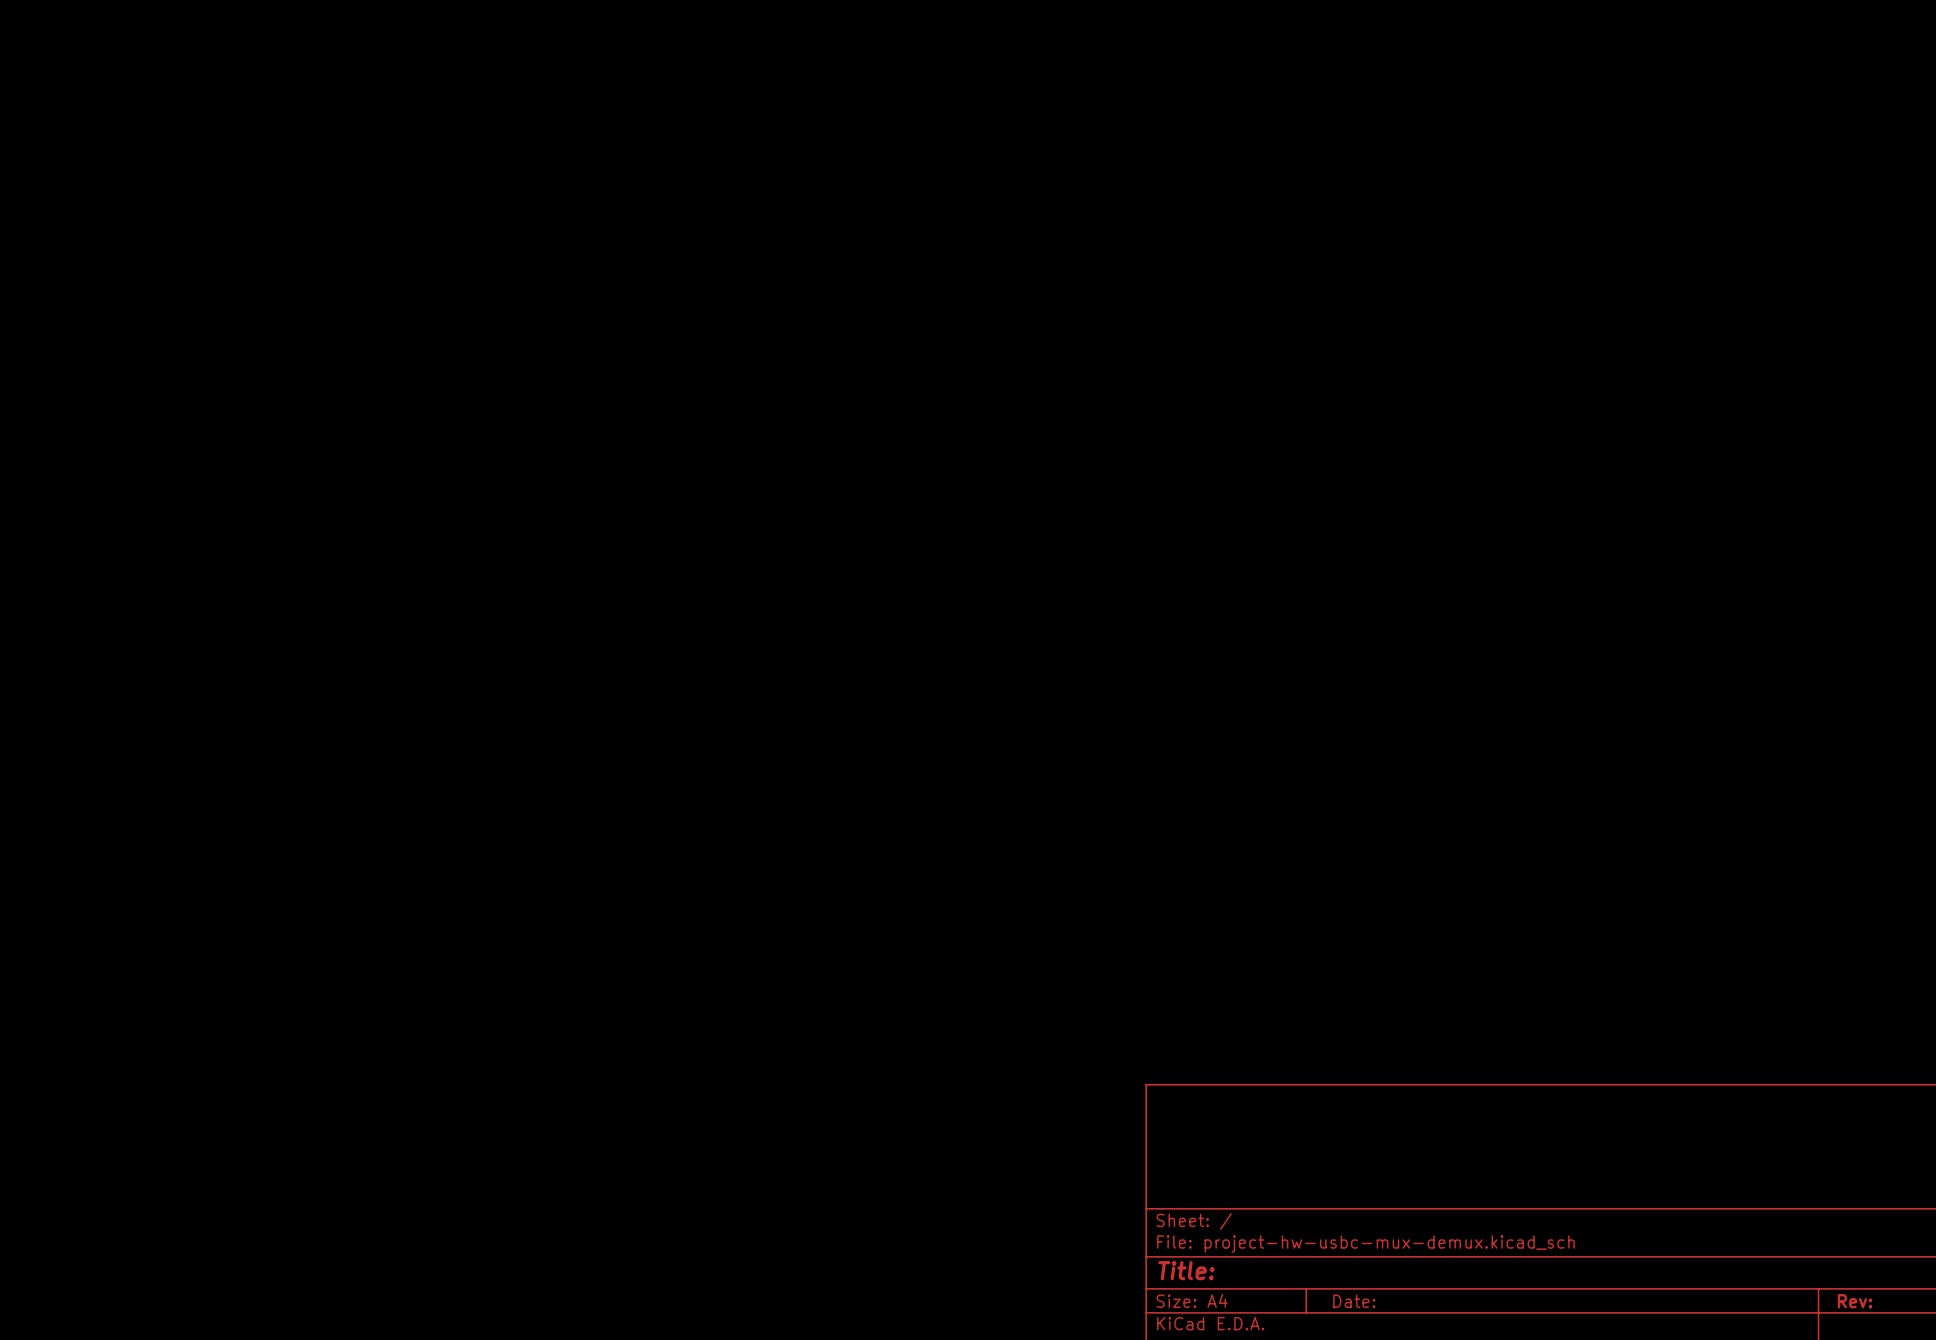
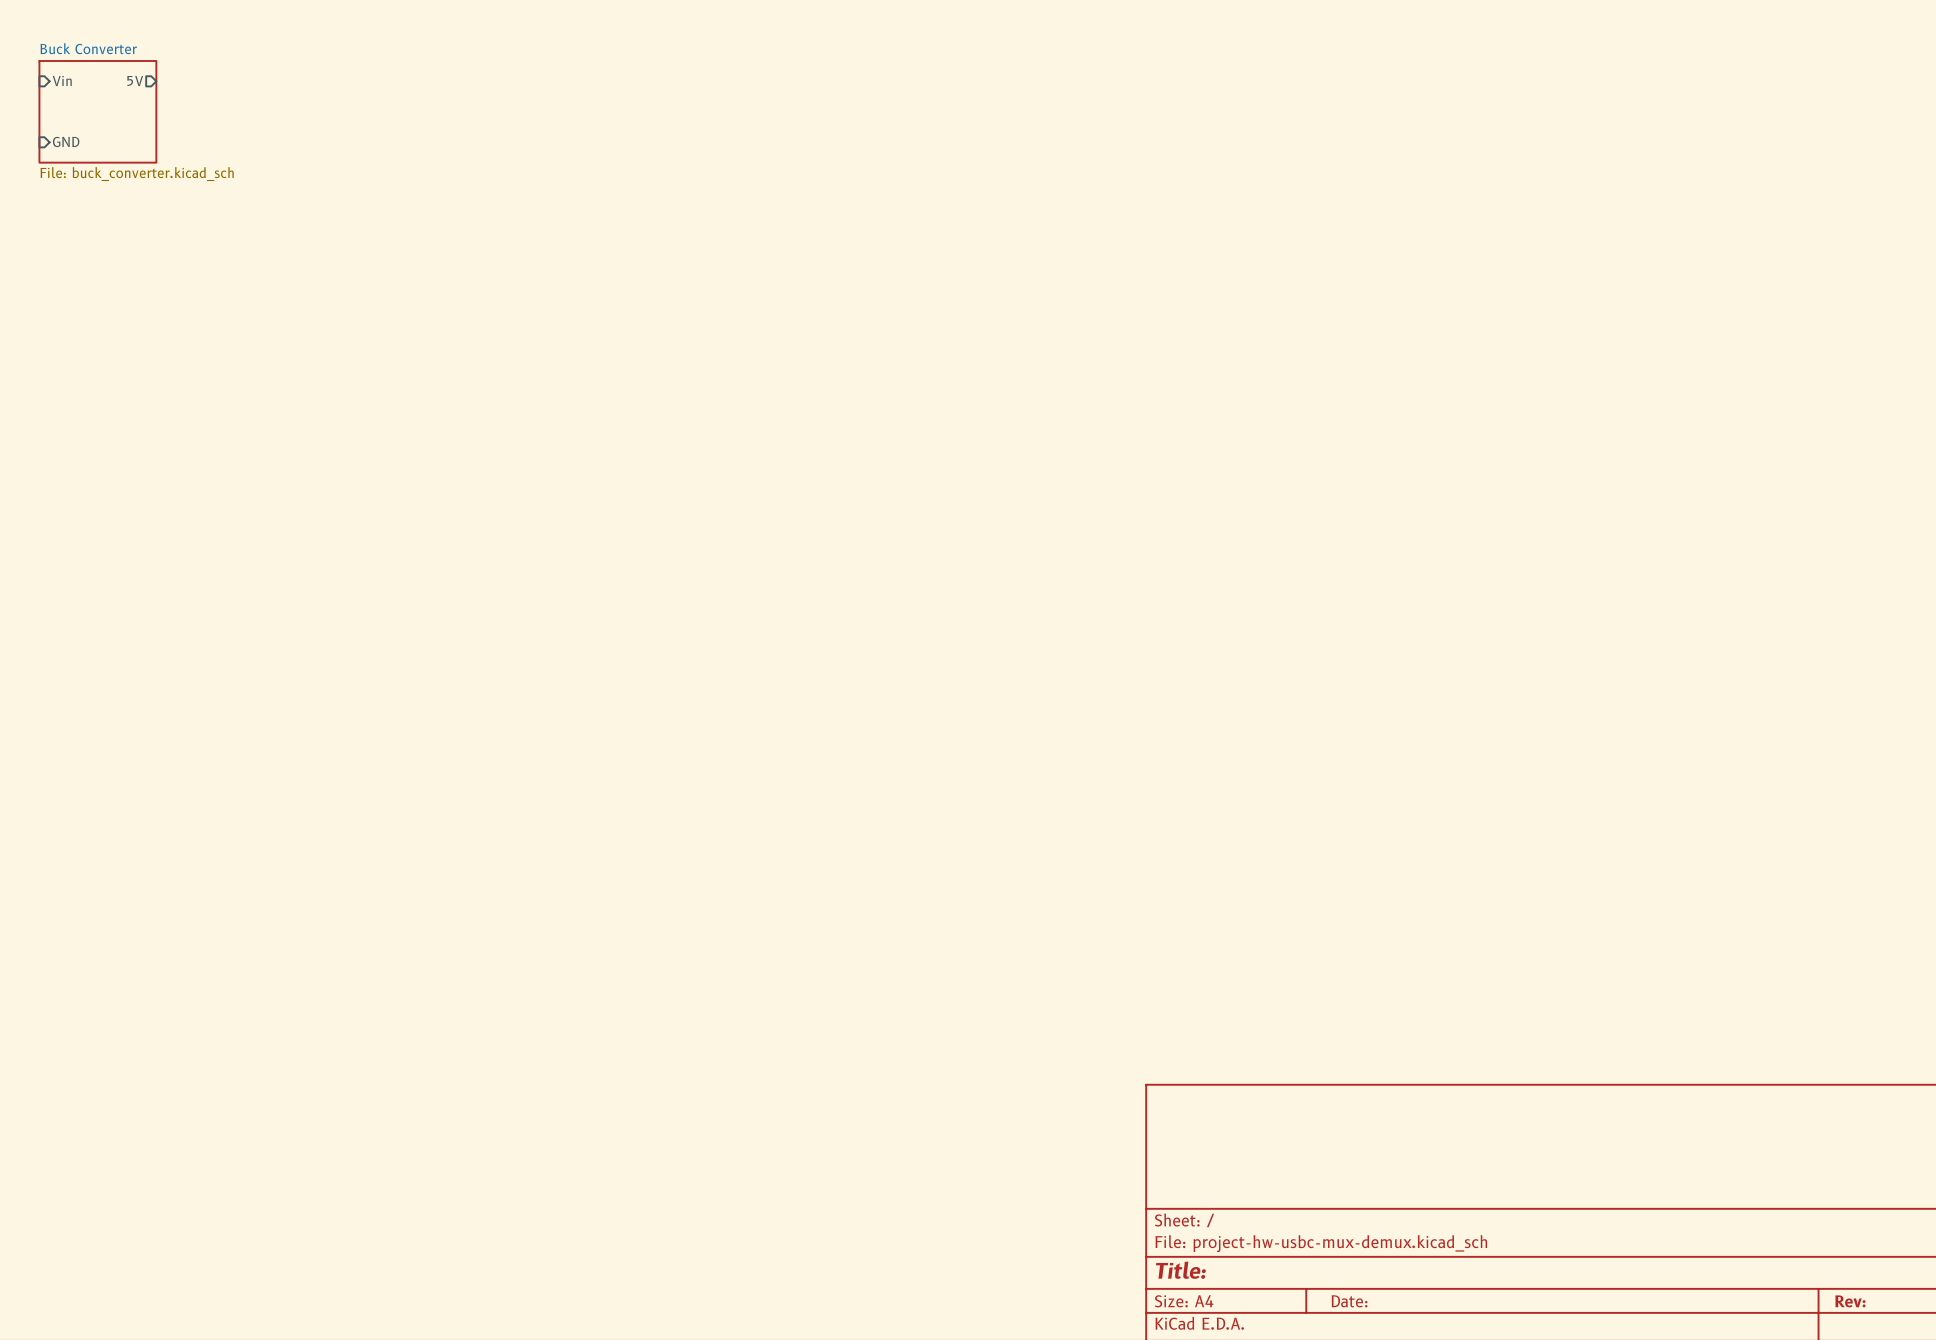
sheet pin: none -> Vin (62, 81)
sheet pin: none -> 5V (135, 81)
sheet Buck Converter: none -> File: buck_converter.kicad_sch (97, 111)
sheet pin: none -> GND (66, 141)

